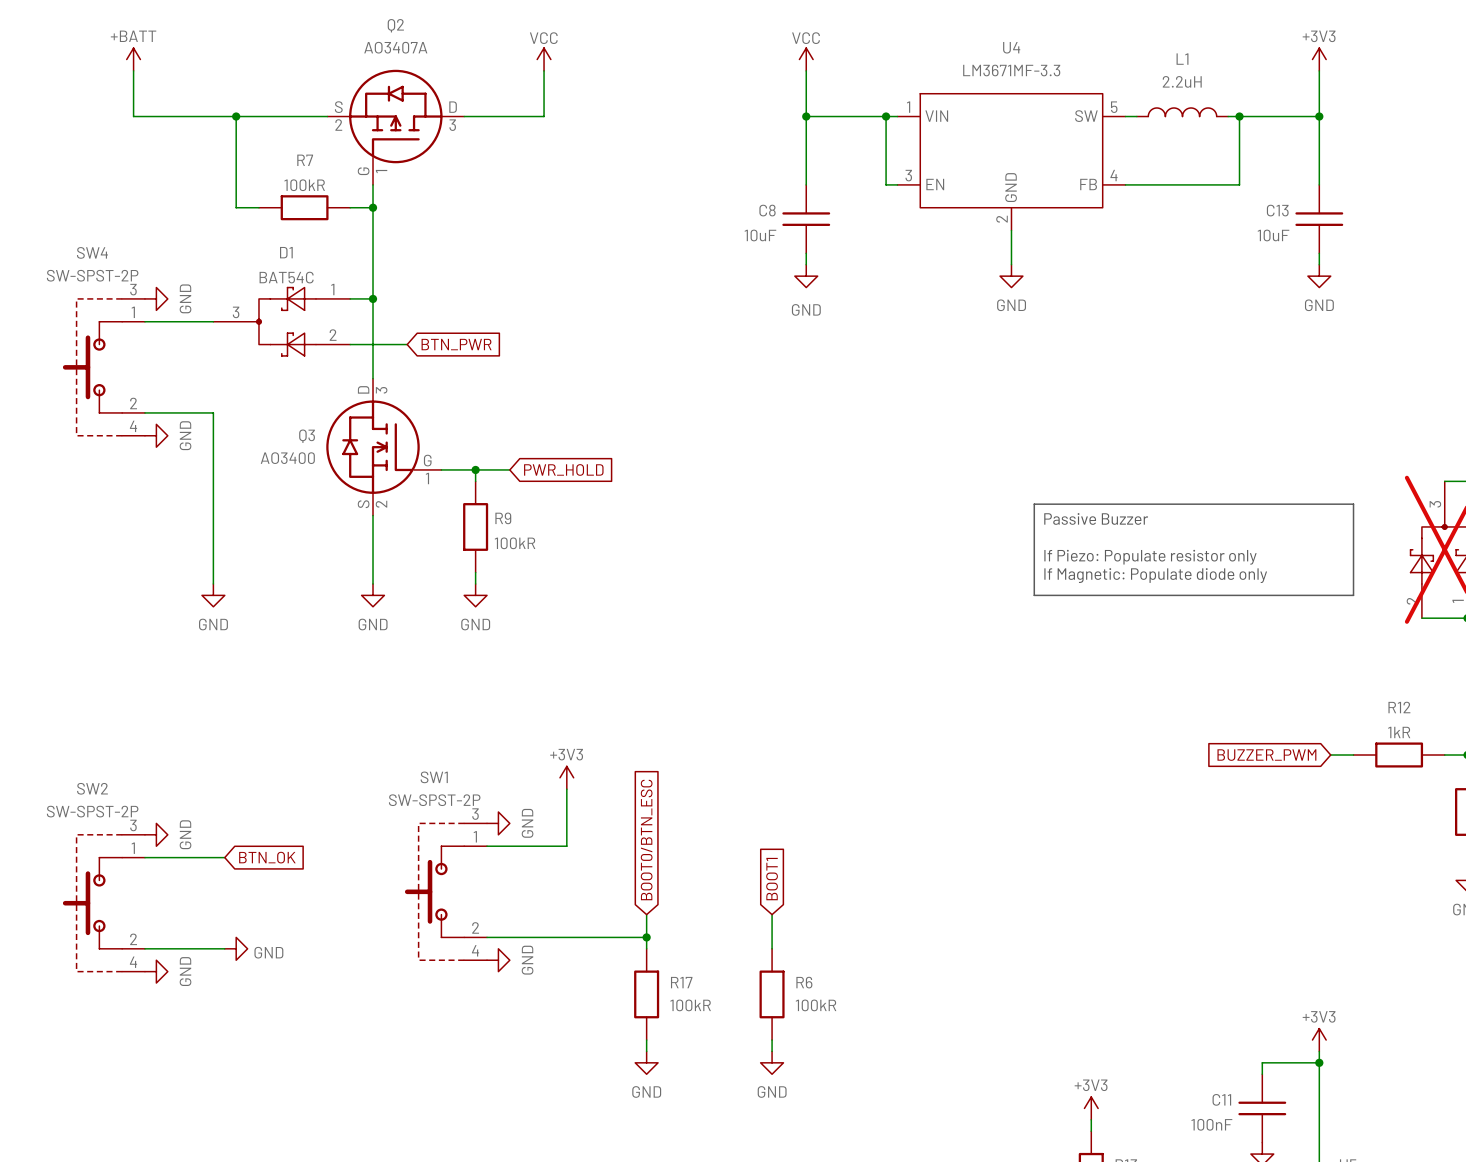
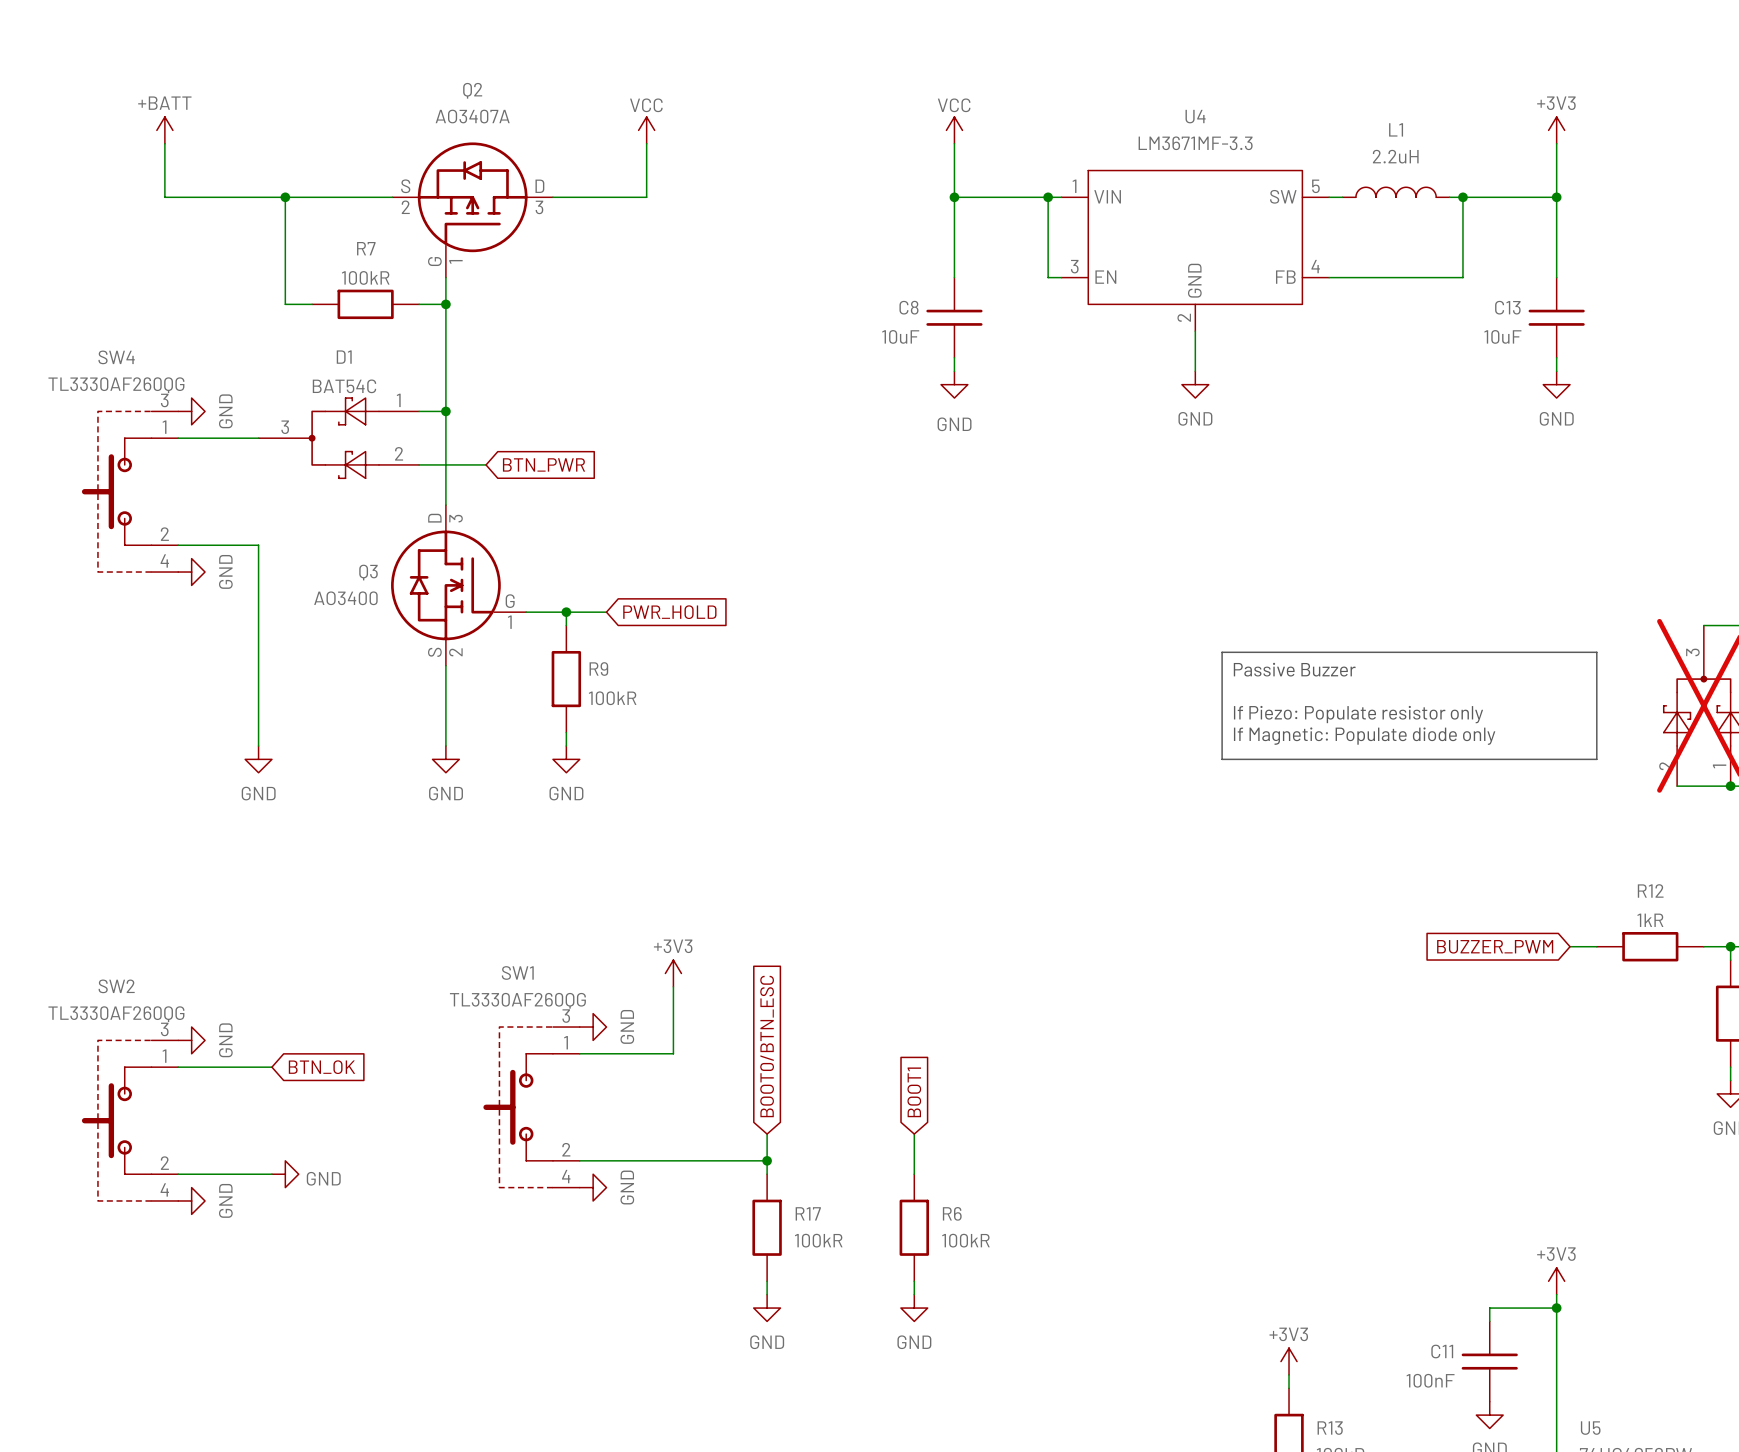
SW4 value: SW-SPST-2P (92, 275) -> TL3330AF260QG (116, 385)
SW1 value: SW-SPST-2P (434, 800) -> TL3330AF260QG (517, 1000)
SW2 value: SW-SPST-2P (92, 811) -> TL3330AF260QG (116, 1014)

